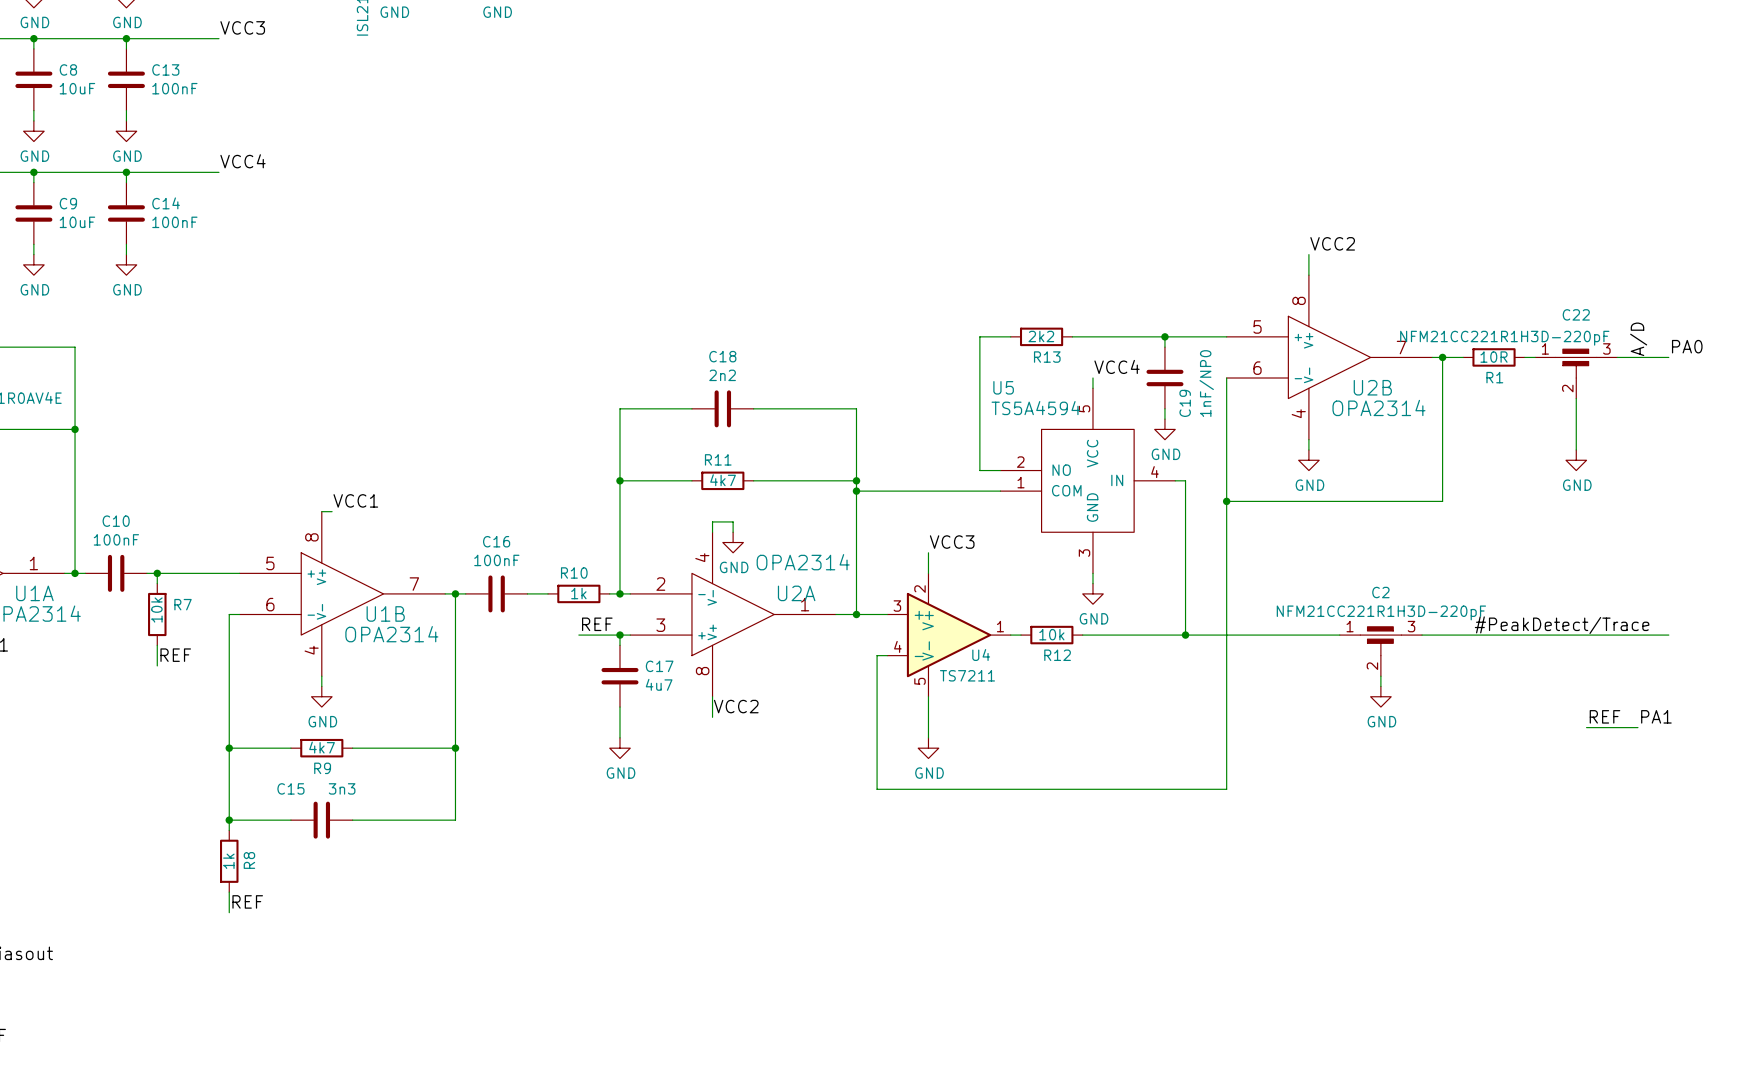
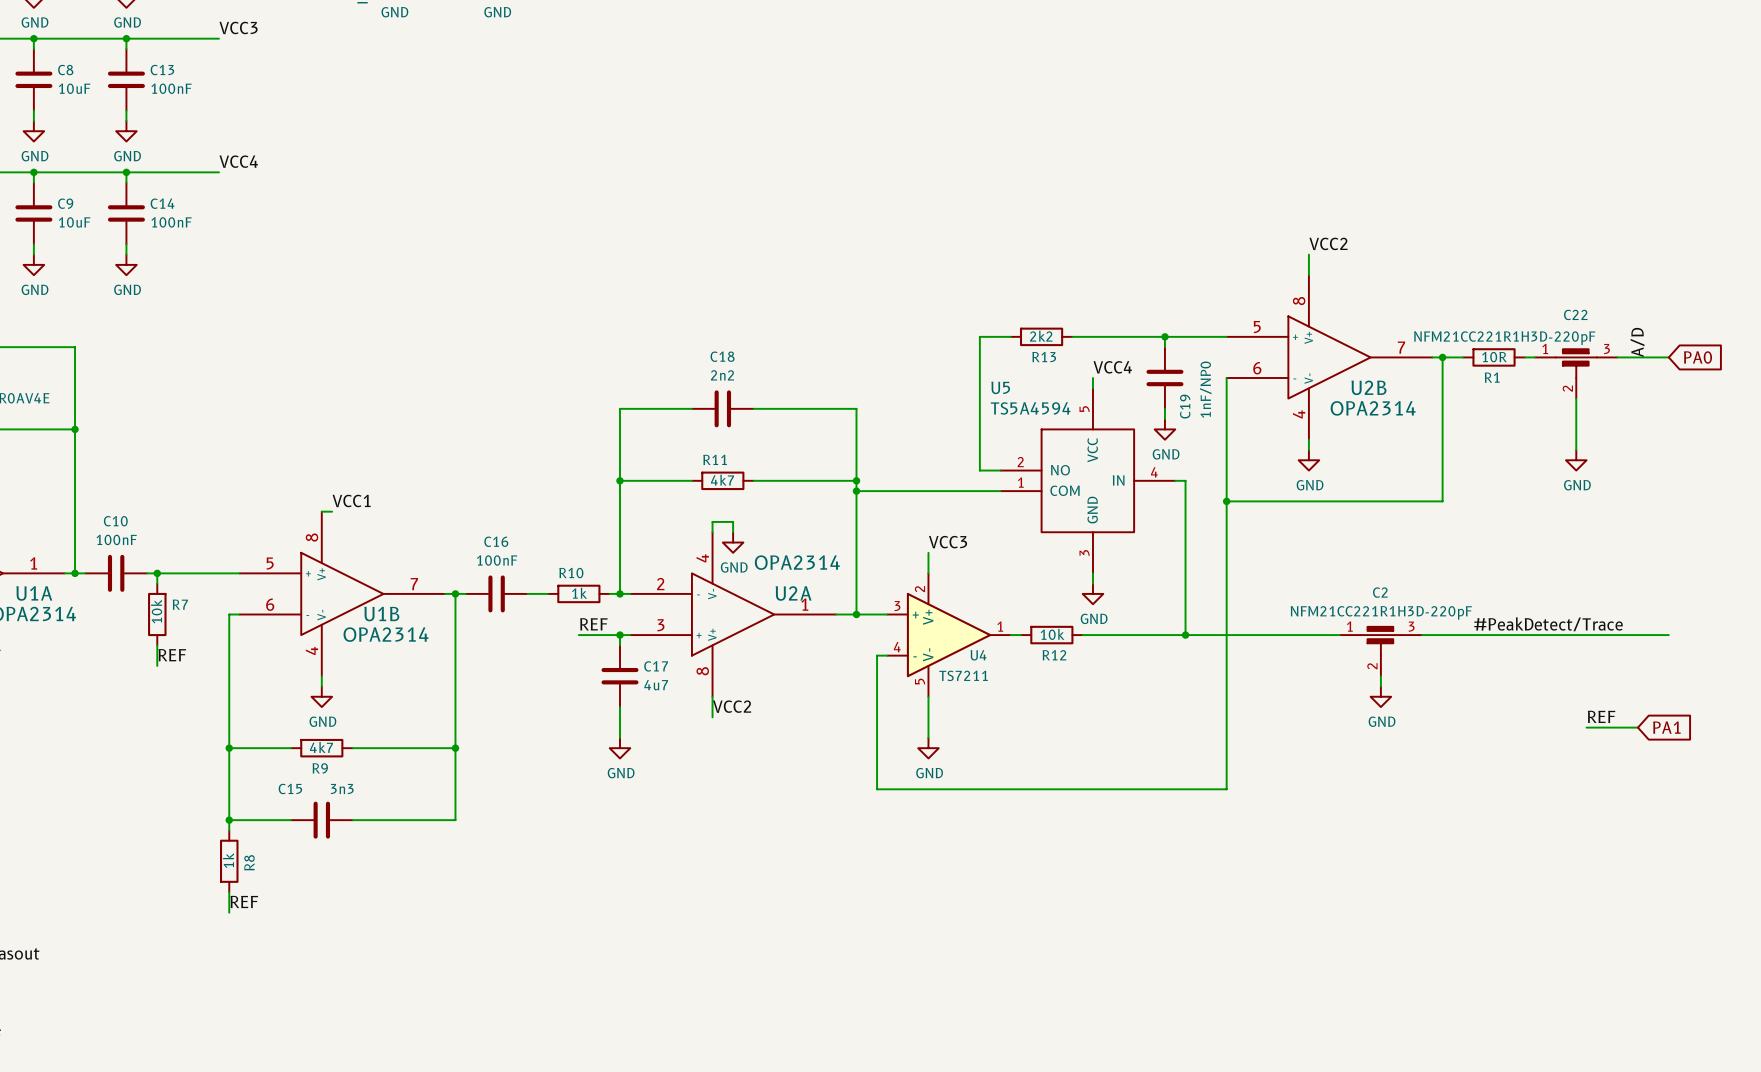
label: PA0 (1687, 346) -> none
global label: none -> PA0 (1697, 357)
label: PA1 (1656, 716) -> none
global label: none -> PA1 (1666, 727)

